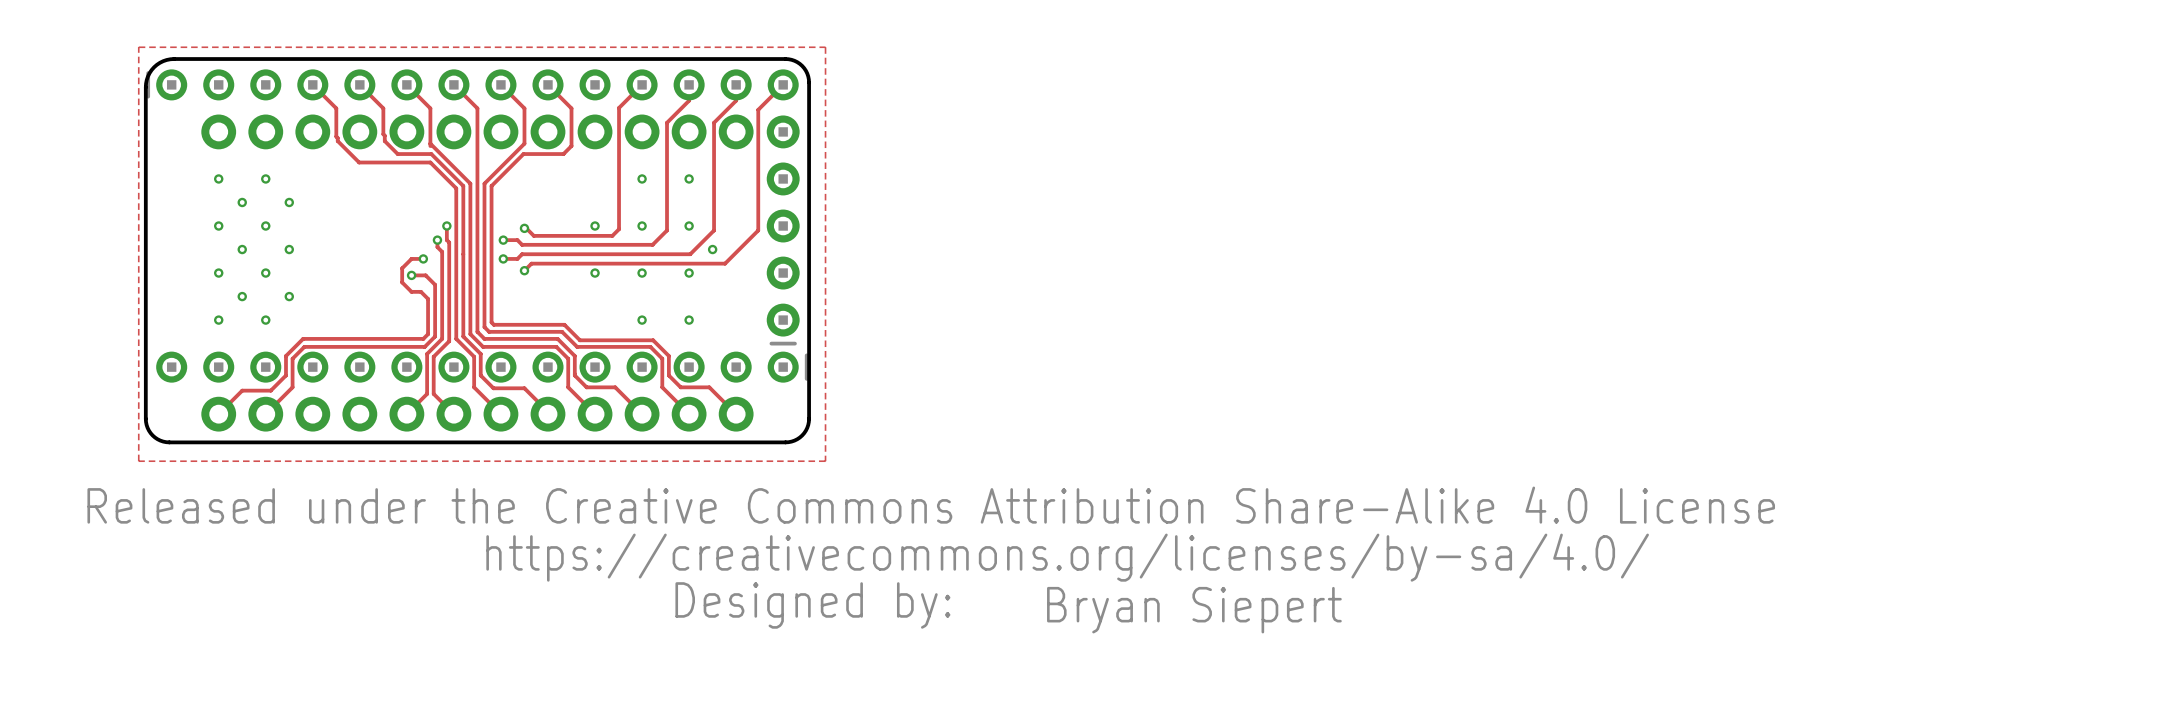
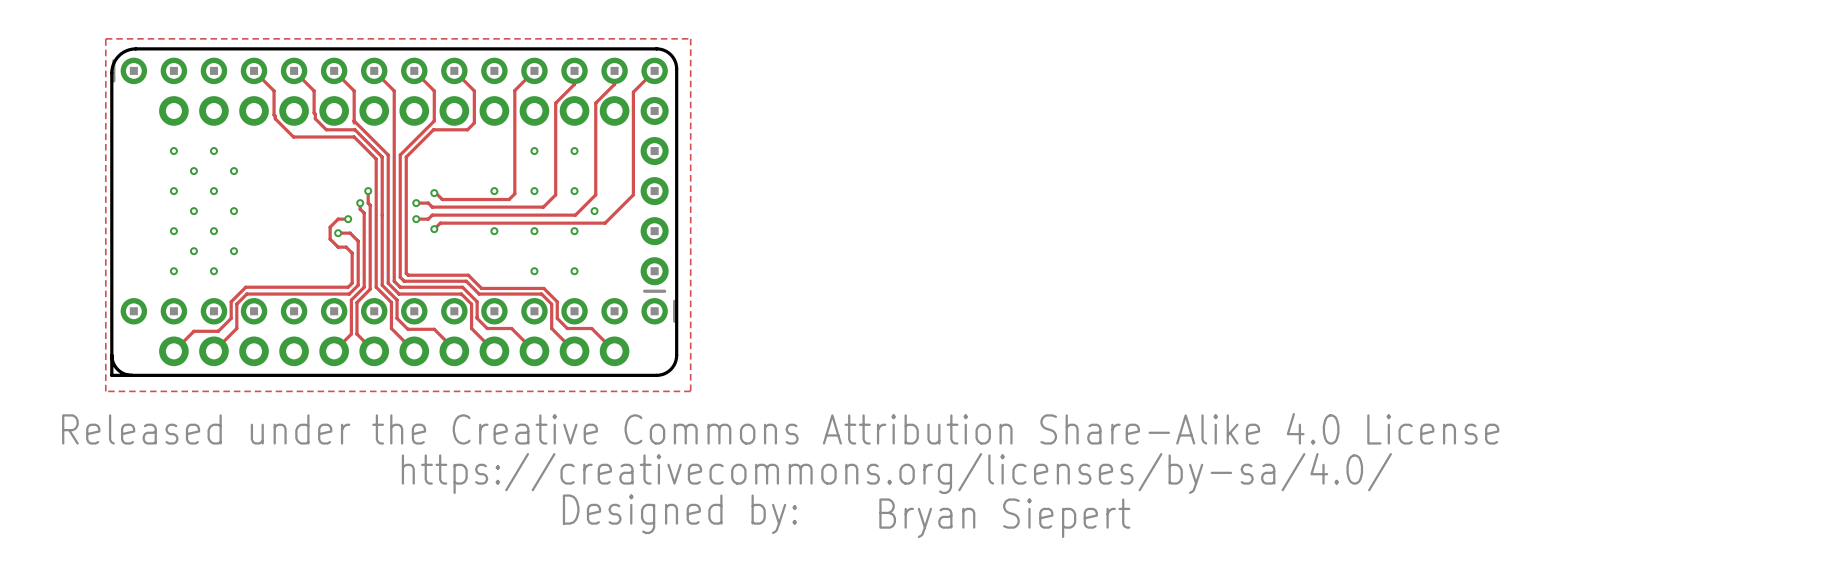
board edge: none -> (111, 355) (111, 375) (131, 375)

